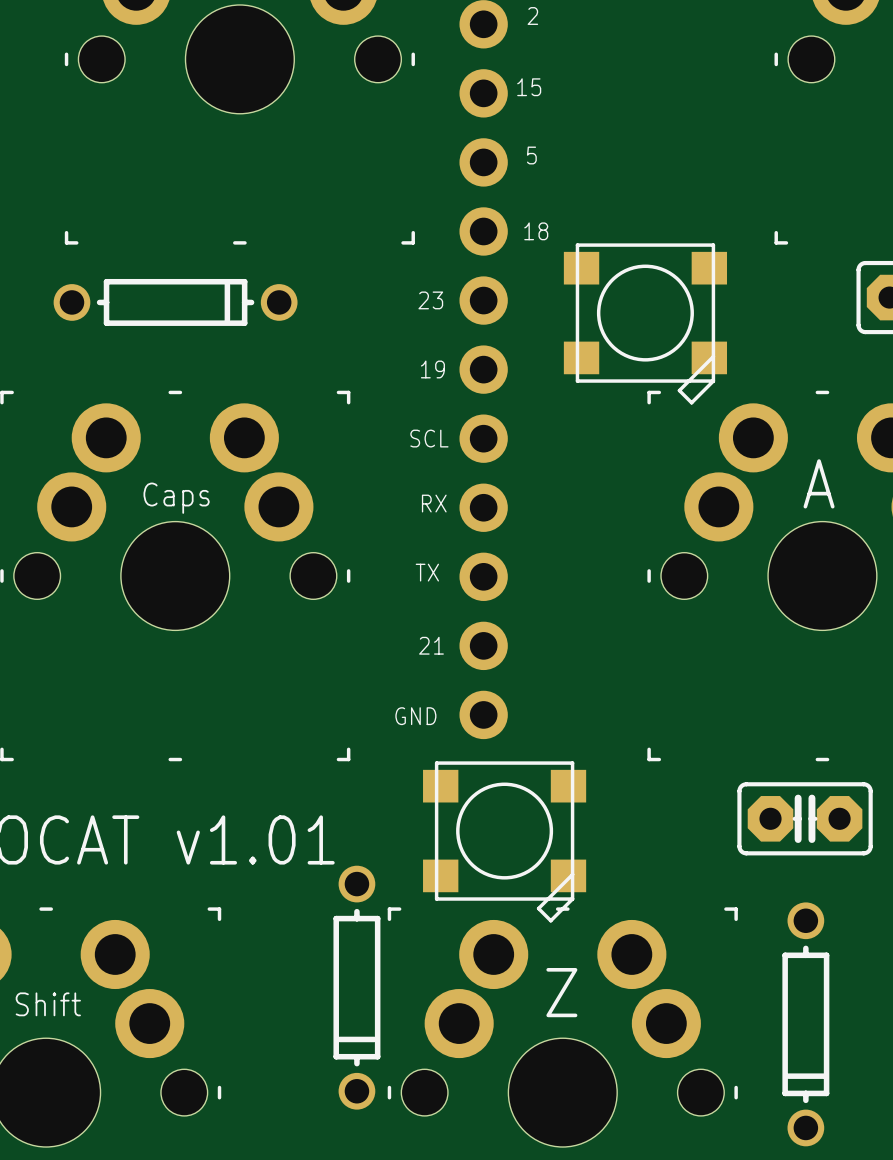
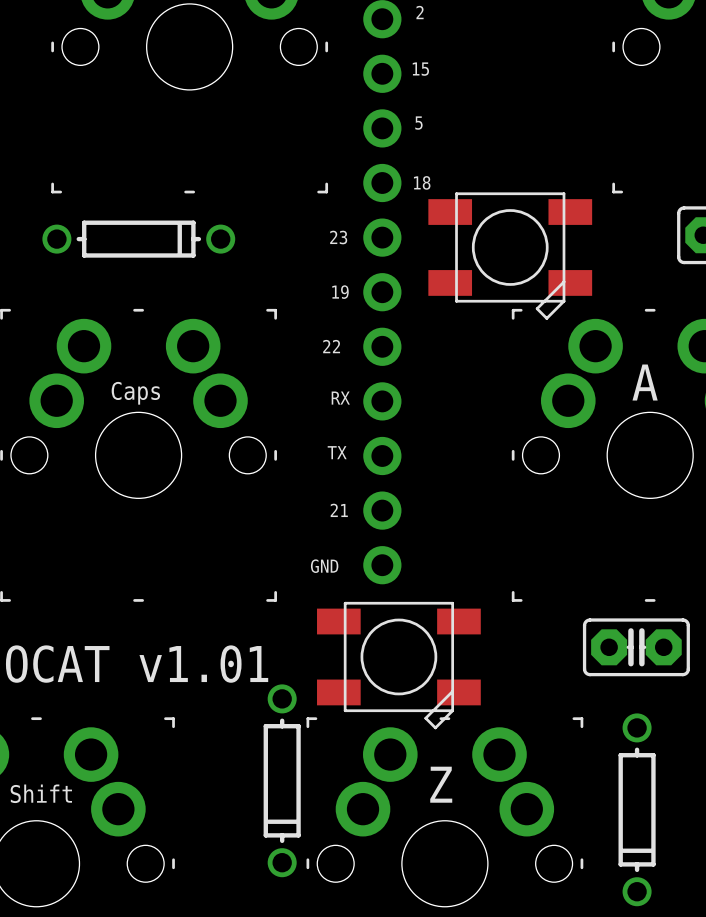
part footprint: [563, 243, 728, 405] -> [428, 192, 593, 320]
text: SCL (429, 438) -> 22 (331, 346)
part footprint: [423, 761, 587, 923] -> [317, 601, 481, 730]

